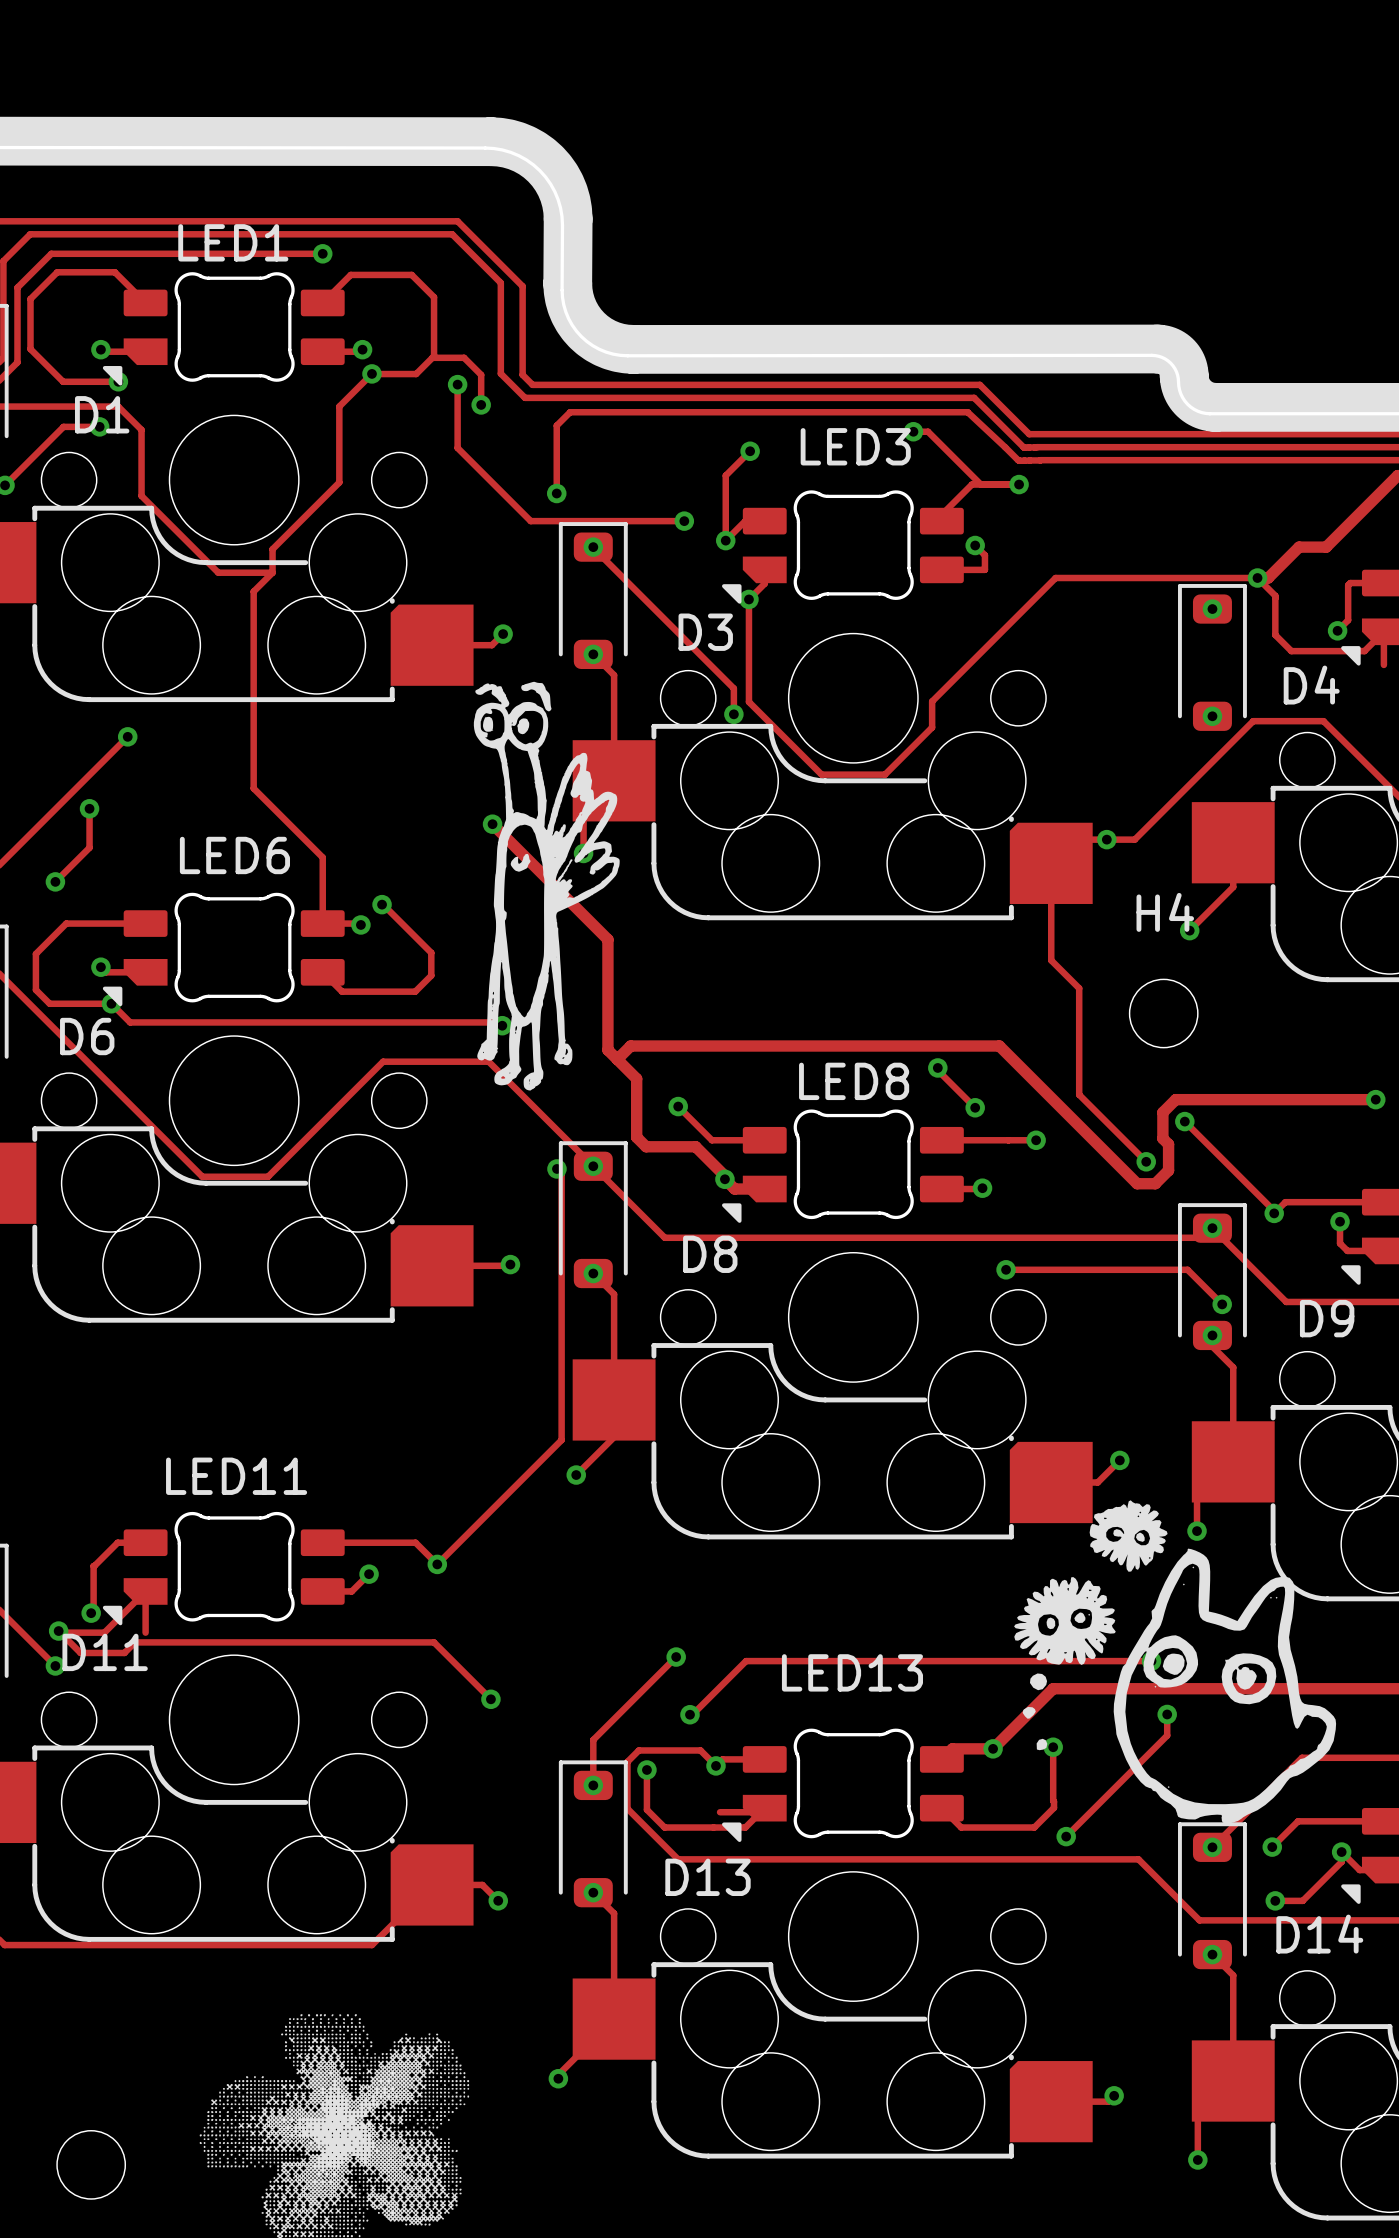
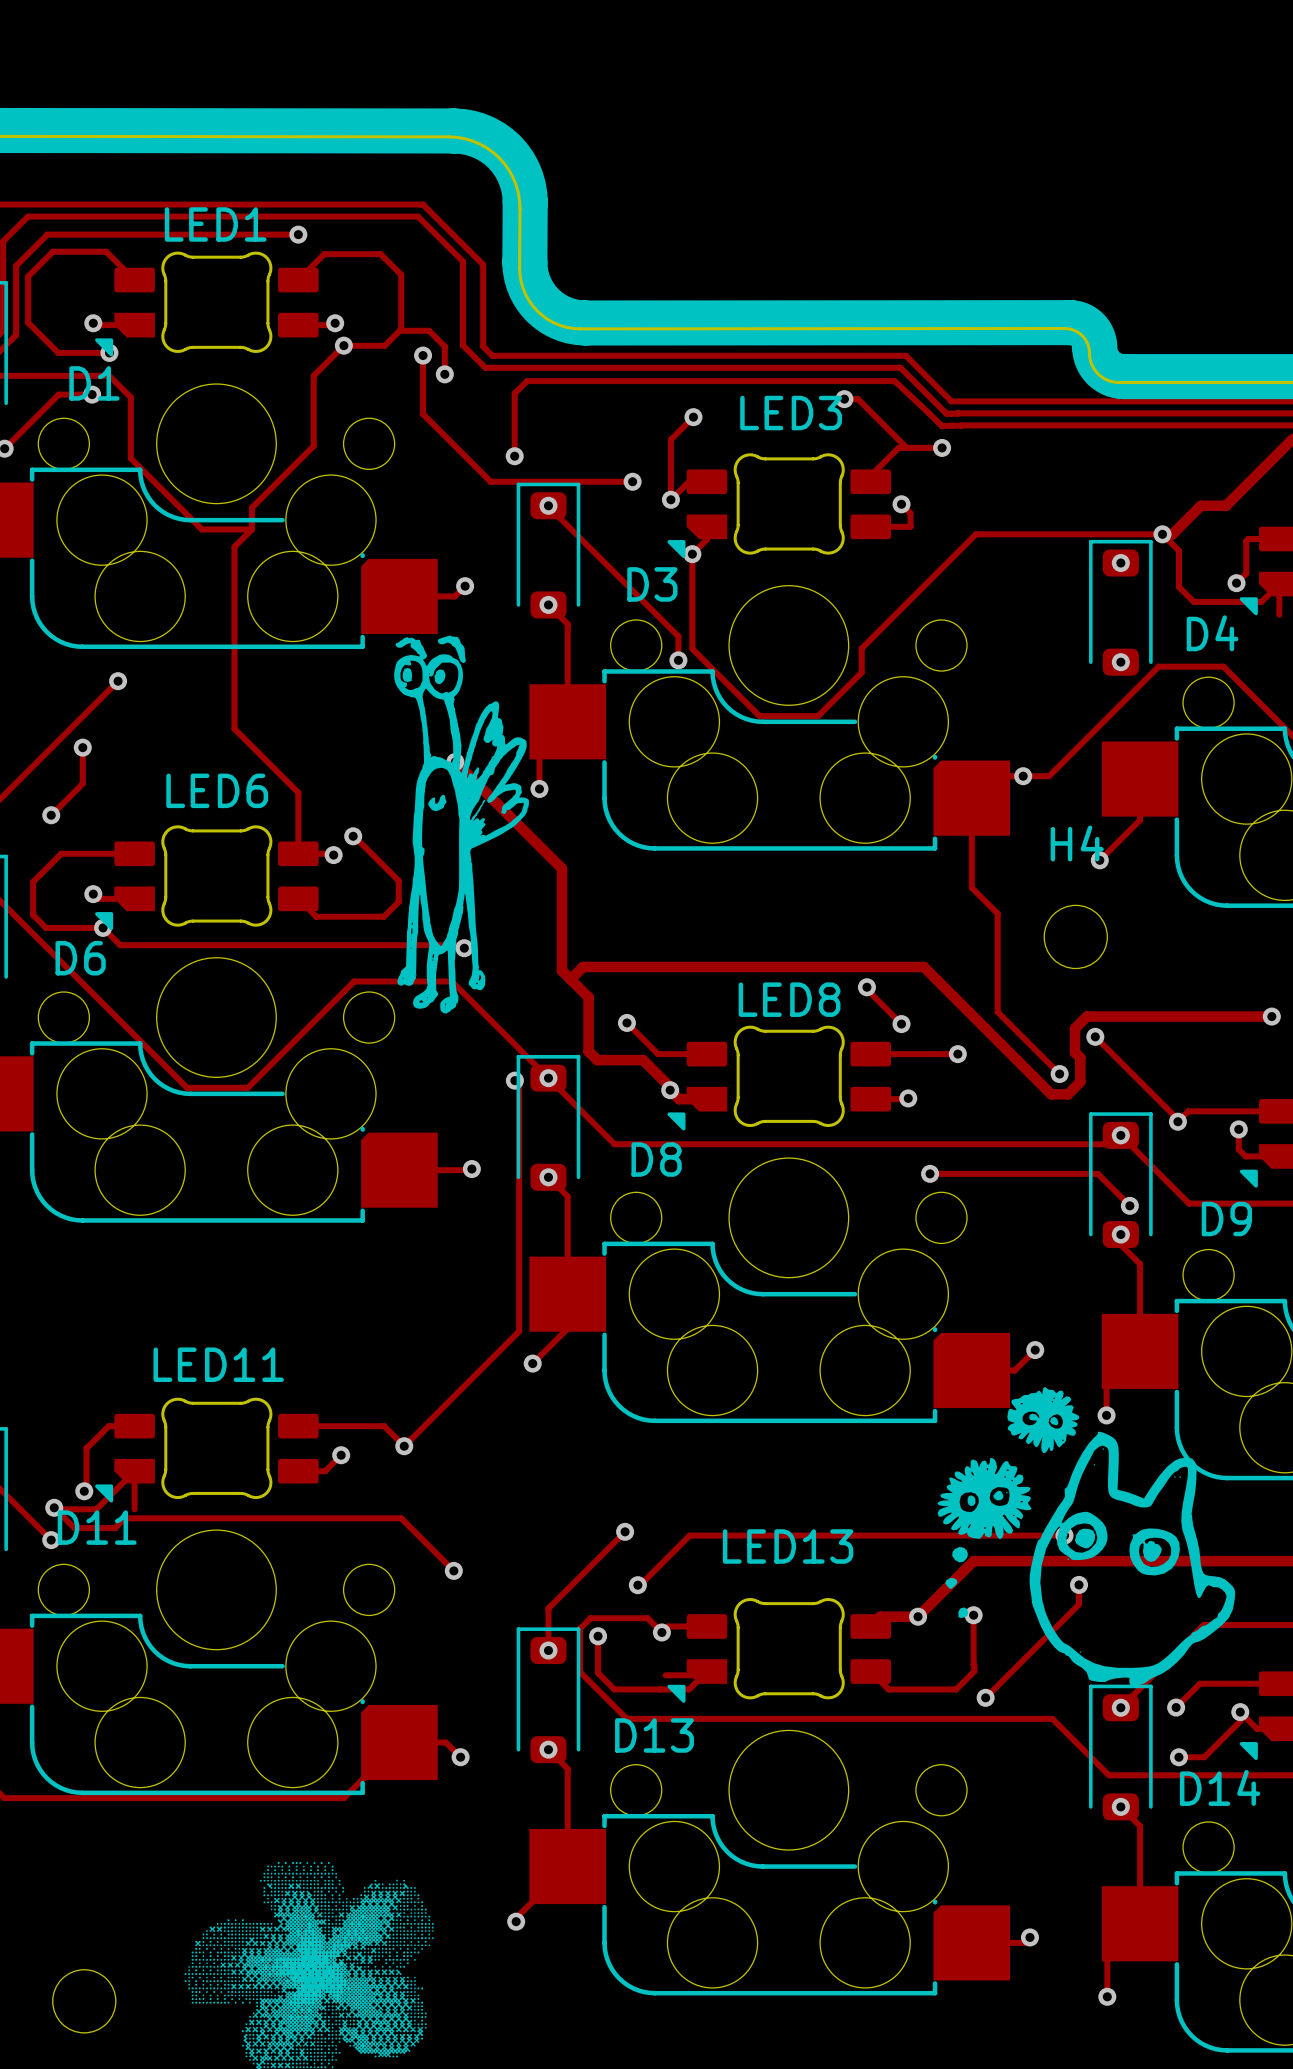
drawing position: (546, 886) -> (461, 824)

